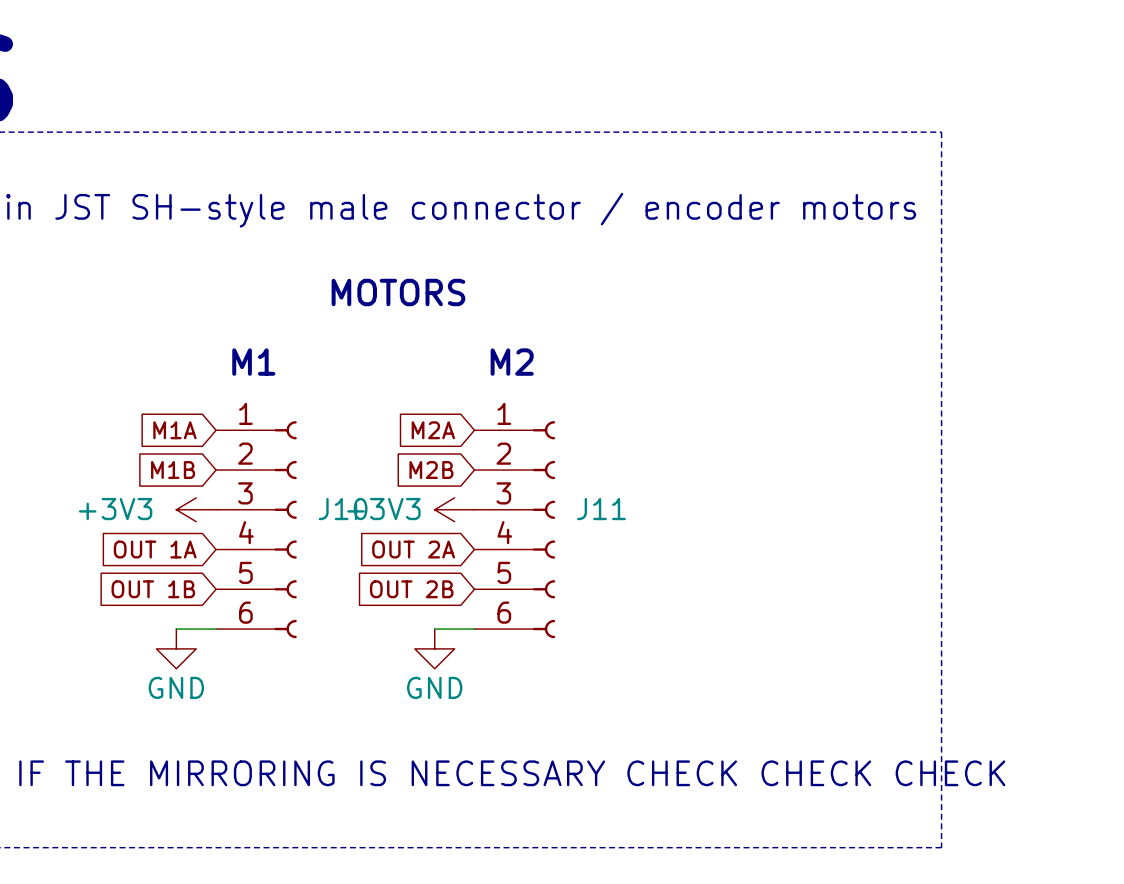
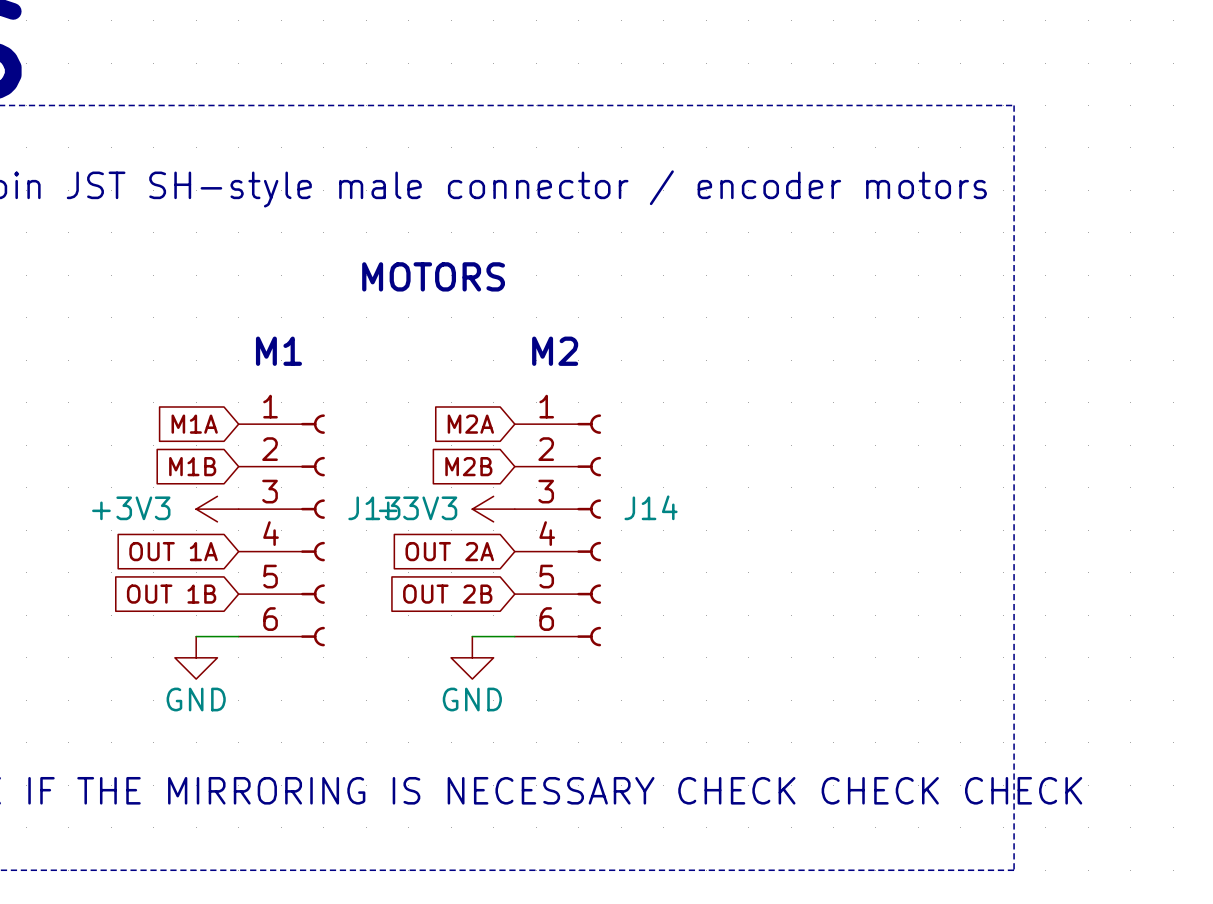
J10 name: J10 (343, 509) -> J13 (374, 508)
J11 name: J11 (601, 509) -> J14 (651, 507)

